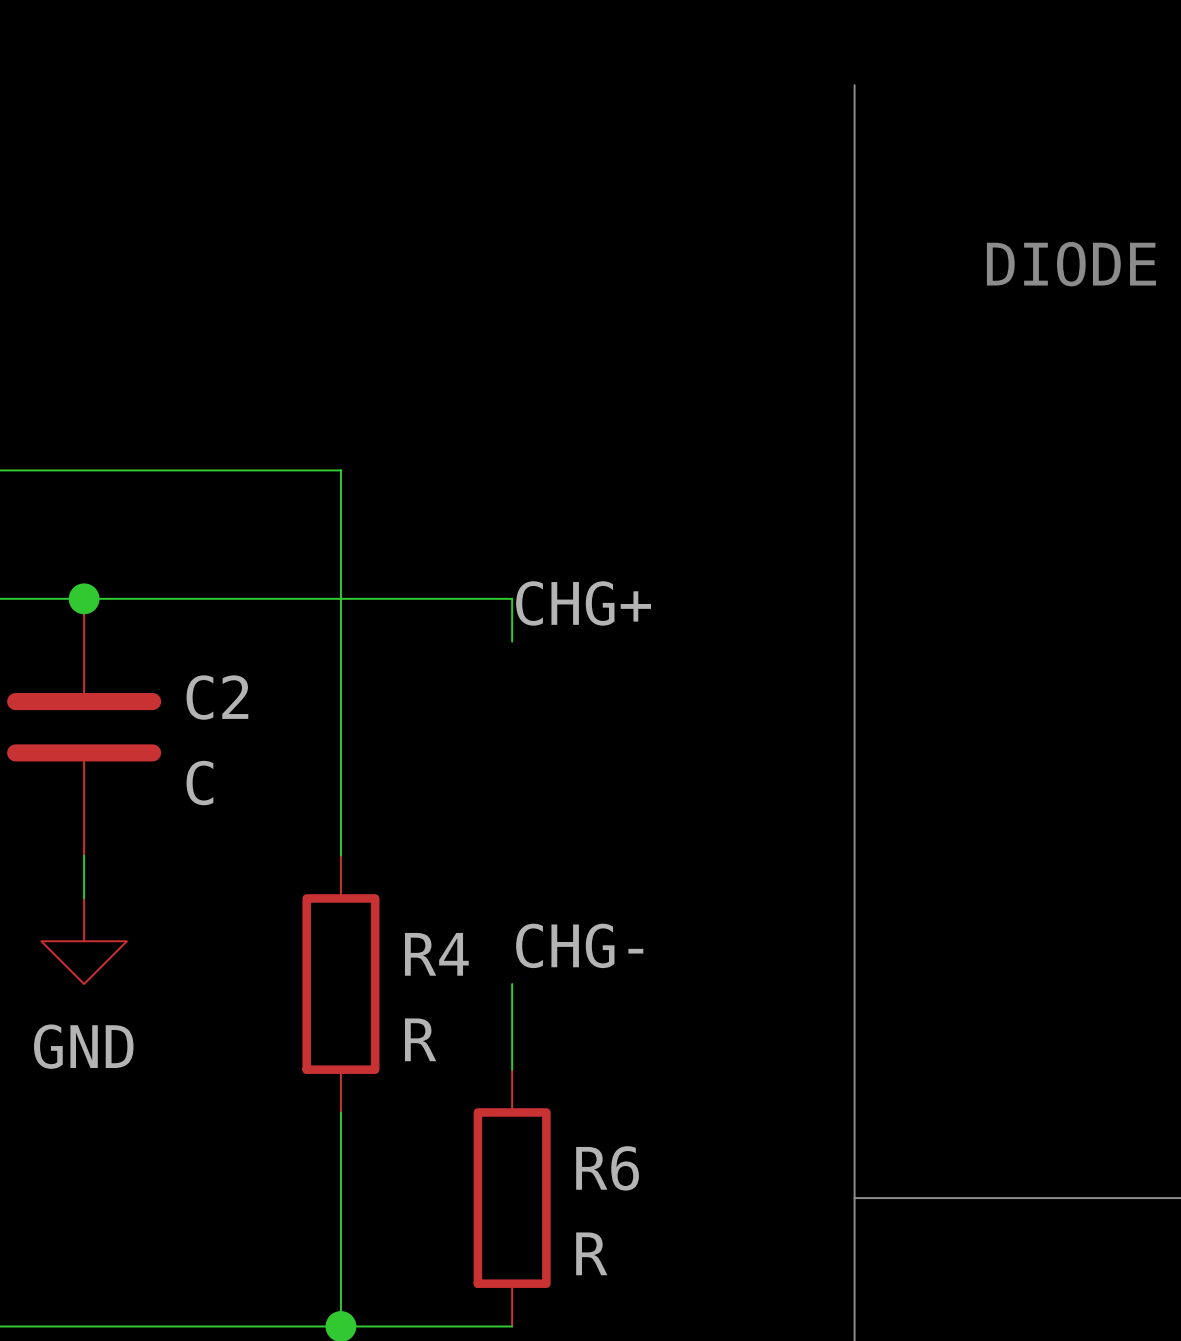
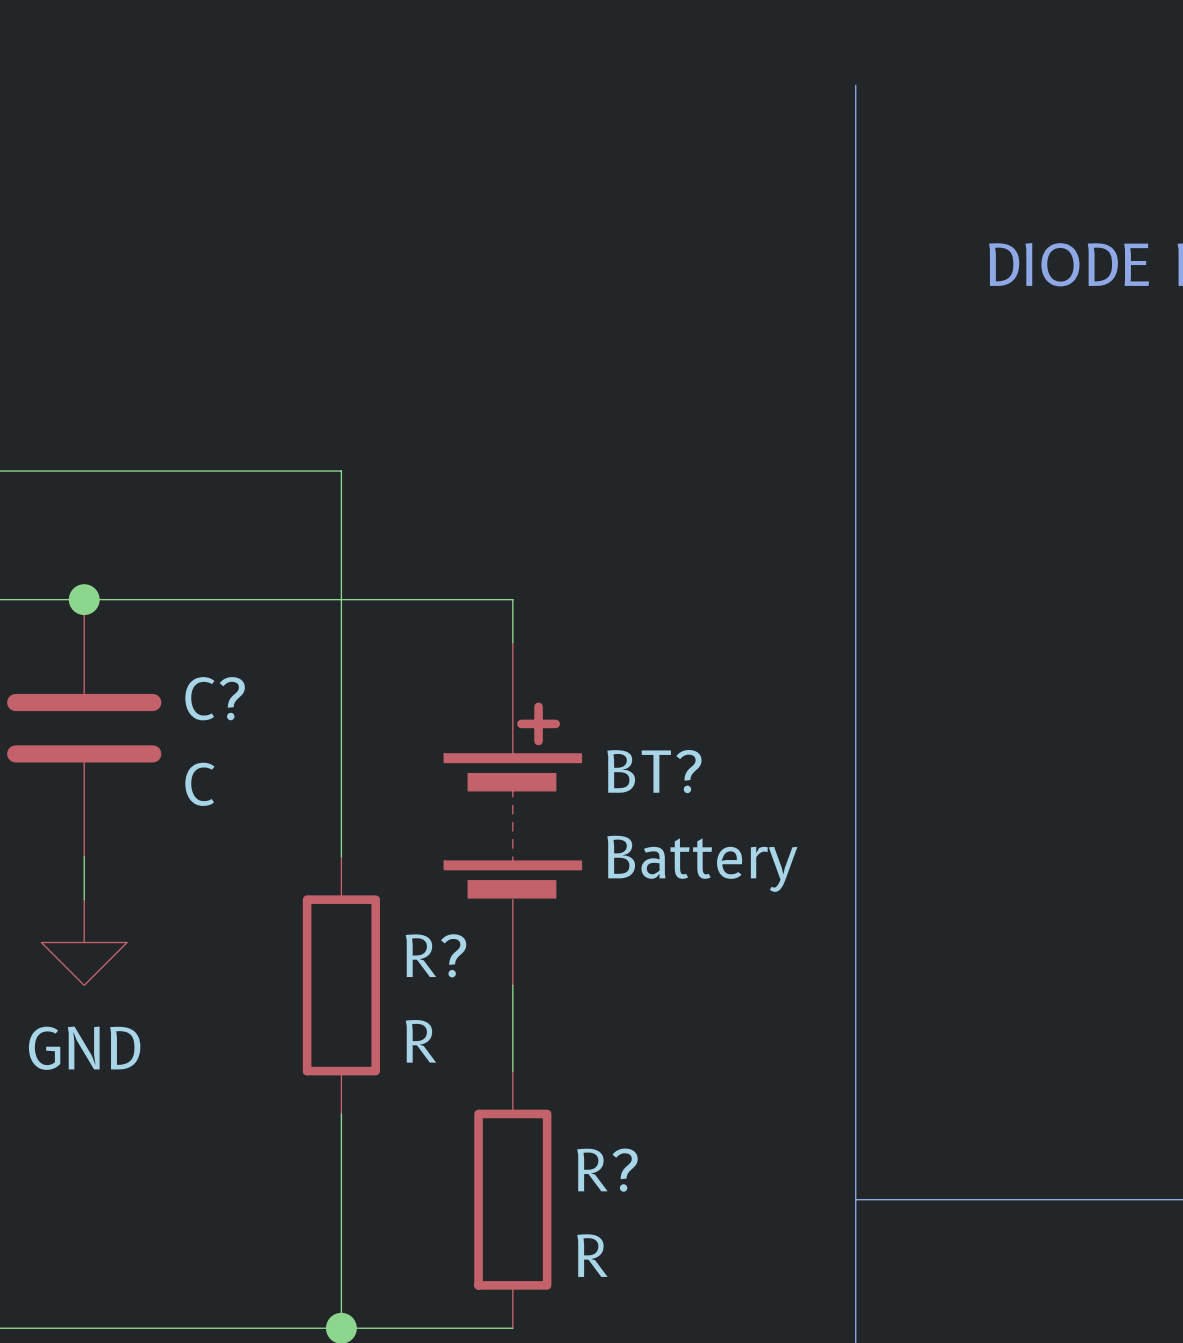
label: CHG+ (583, 603) -> none
C2 name: C2 (217, 697) -> C? (215, 698)
BT?: none -> Battery (512, 813)
label: CHG- (579, 945) -> none
R4 name: R4 (436, 954) -> R? (436, 955)
R6 name: R6 (607, 1168) -> R? (607, 1170)

